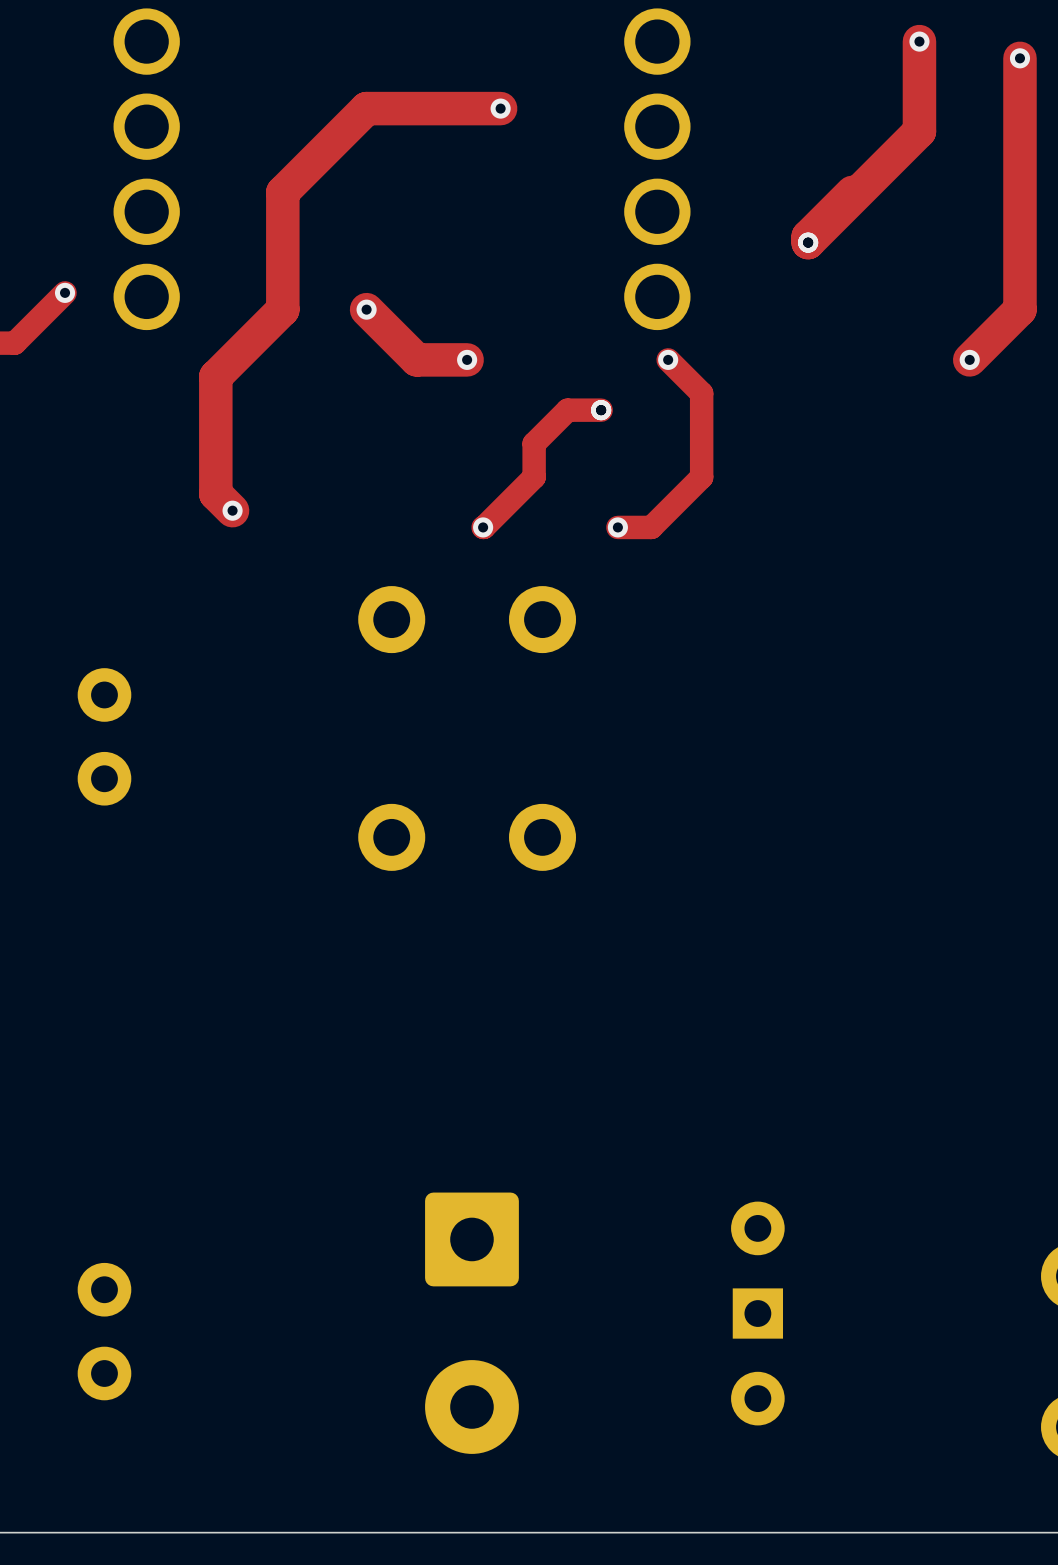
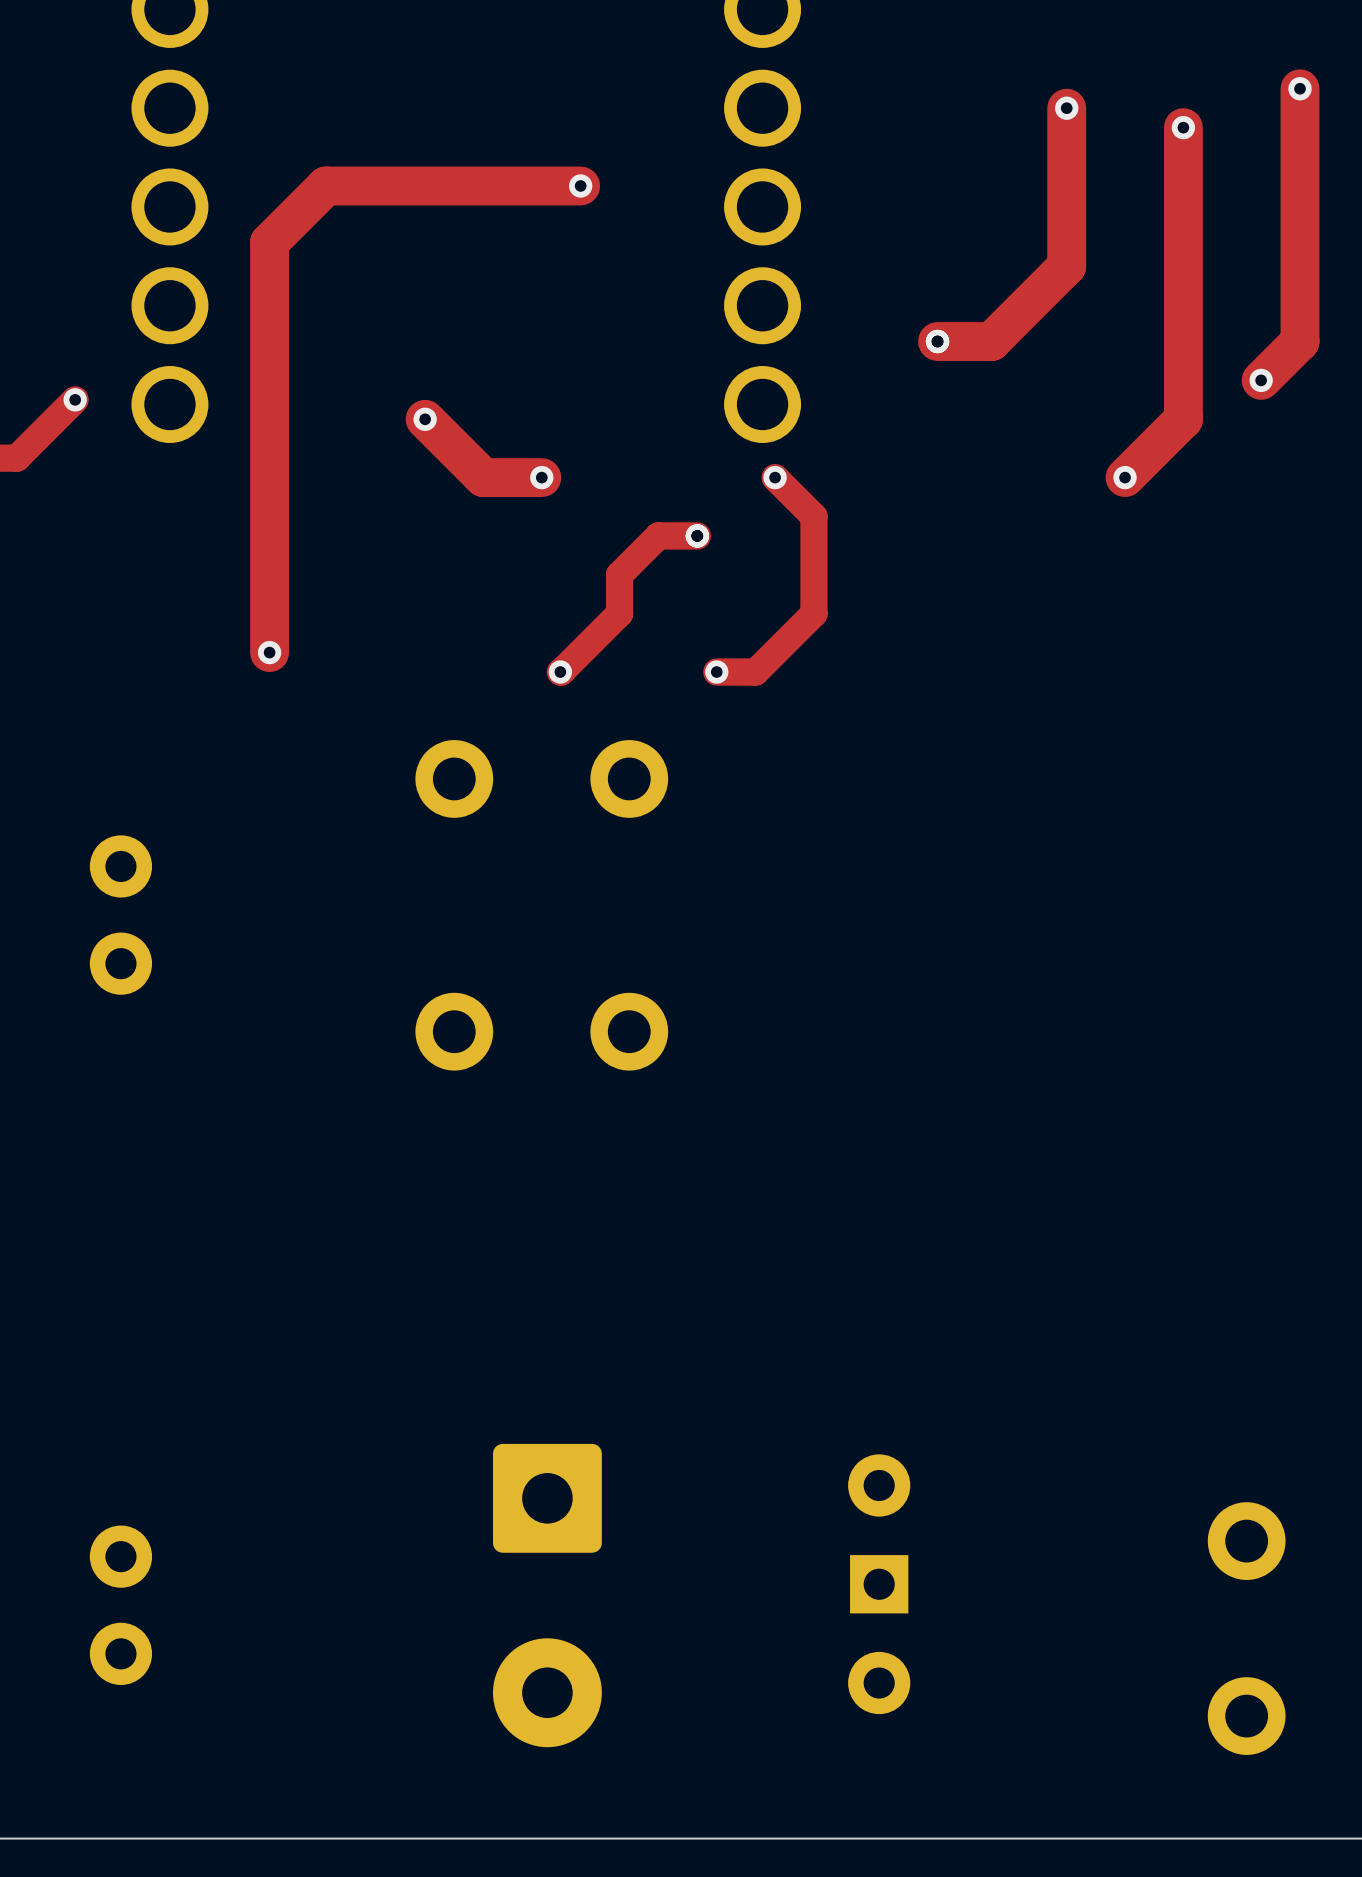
track: (366, 108) (282, 192) (282, 309) (215, 376) (215, 493) (232, 510) -> (425, 185) (326, 185) (269, 242) (269, 652)
track: (919, 131) (808, 242) (808, 236) (852, 192) -> (1066, 212) (1066, 266) (991, 341) (937, 341)

